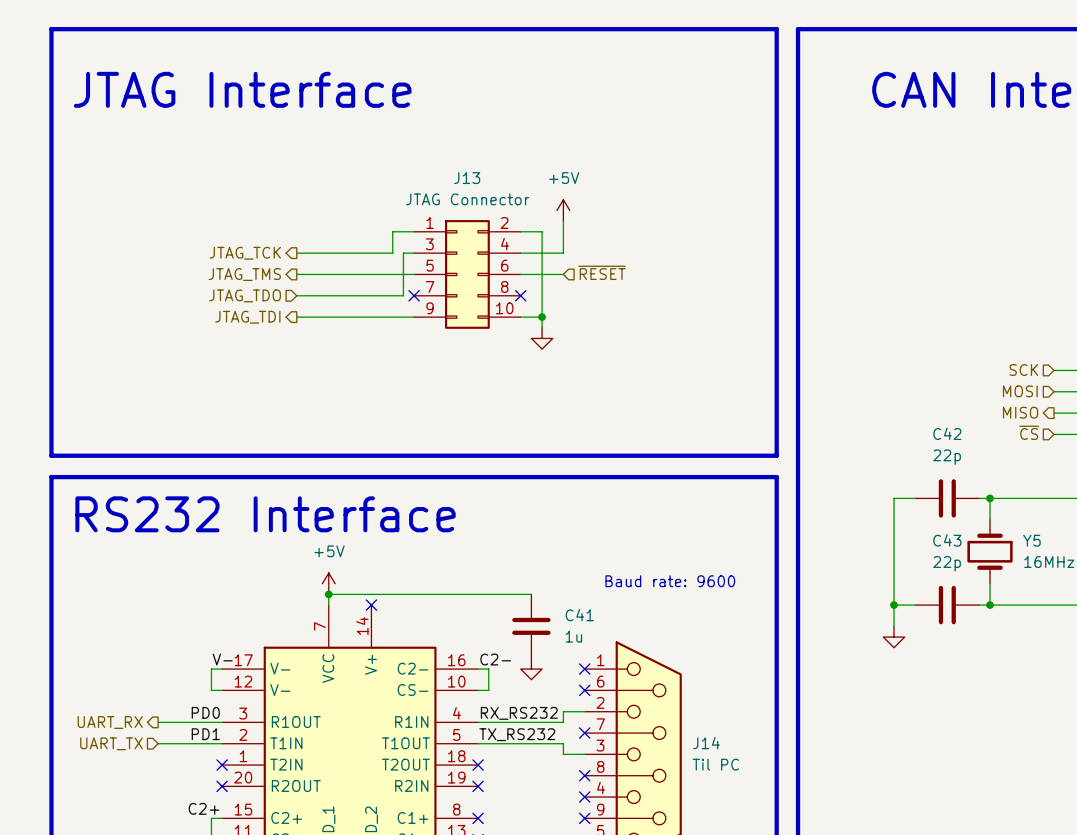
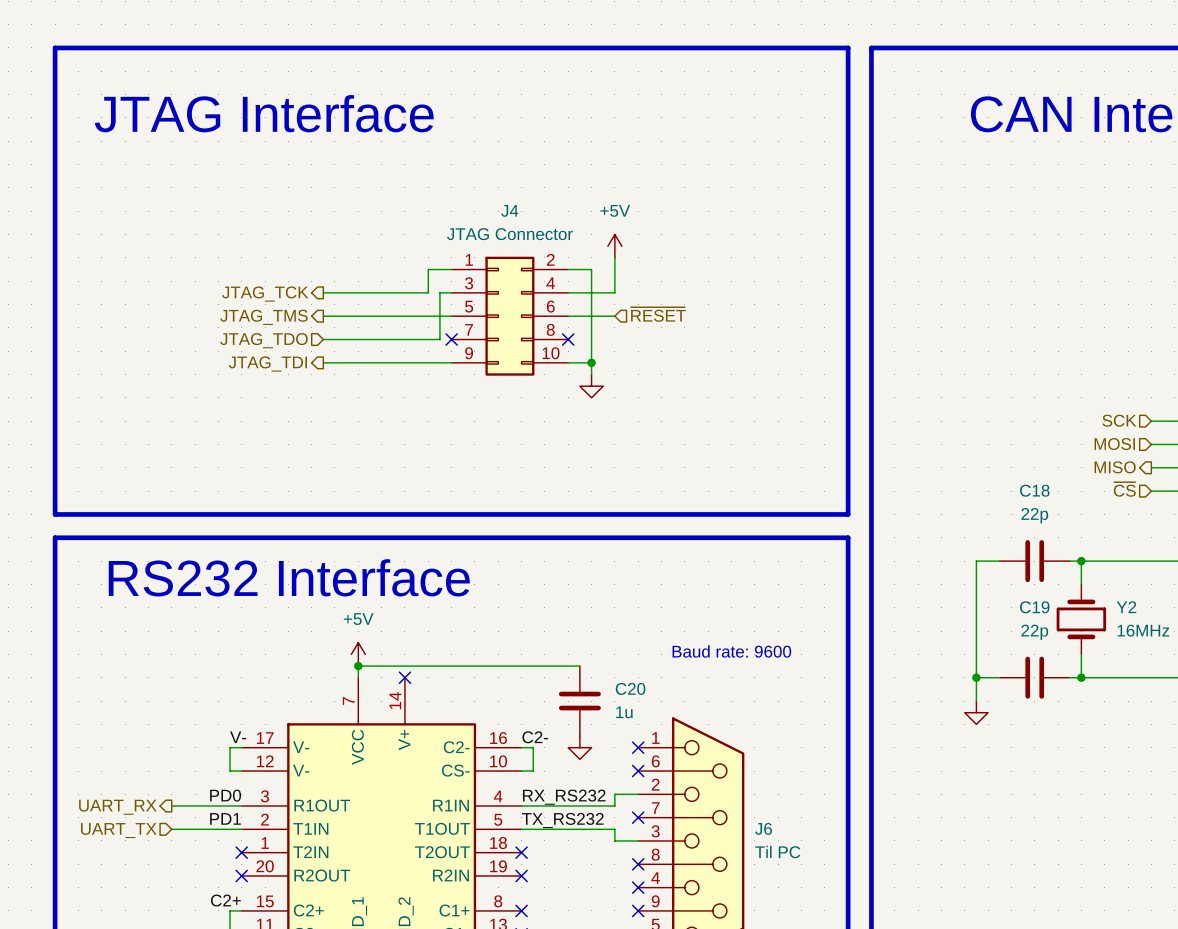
J13 name: J13 (467, 178) -> J4 (509, 210)
C42 name: C42 (947, 433) -> C18 (1034, 490)
C43 name: C43 (947, 540) -> C19 (1034, 607)
Y5 name: Y5 (1031, 540) -> Y2 (1126, 607)
C41 name: C41 (579, 615) -> C20 (630, 688)
J14 name: J14 (706, 743) -> J6 (763, 828)

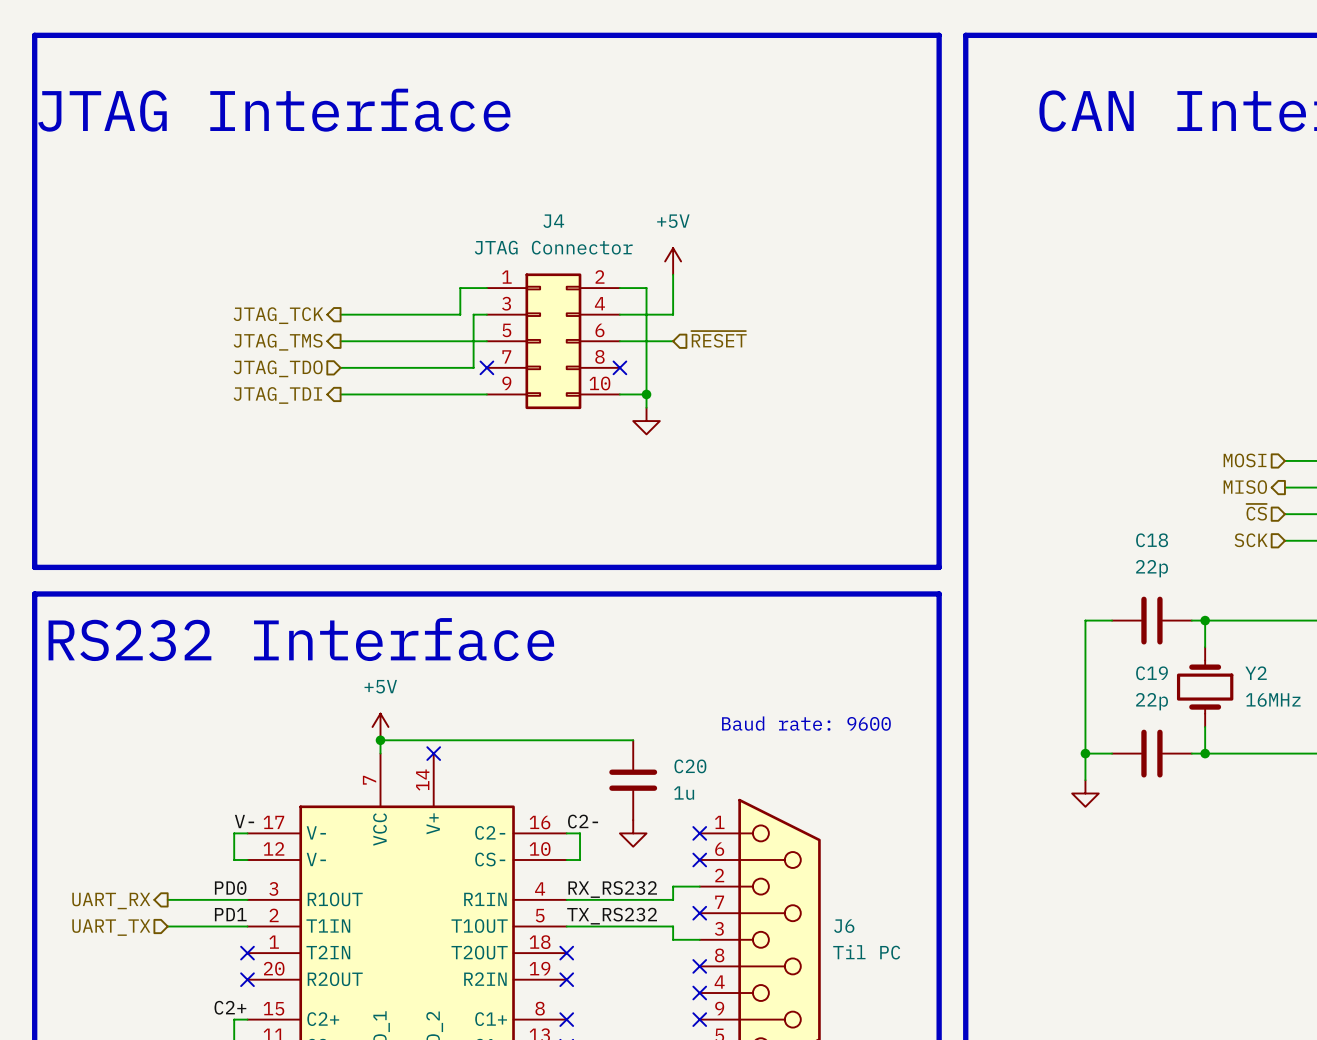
hierarchical label: SCK (1119, 420) -> MOSI (1245, 460)
hierarchical label shape: input (1114, 444) -> output (1245, 487)
hierarchical label: MOSI (1114, 444) -> MISO (1245, 487)
hierarchical label shape: output (1115, 467) -> input (1256, 512)
hierarchical label: MISO (1115, 467) -> ~{CS} (1256, 512)
hierarchical label: ~{CS} (1124, 489) -> SCK (1251, 540)

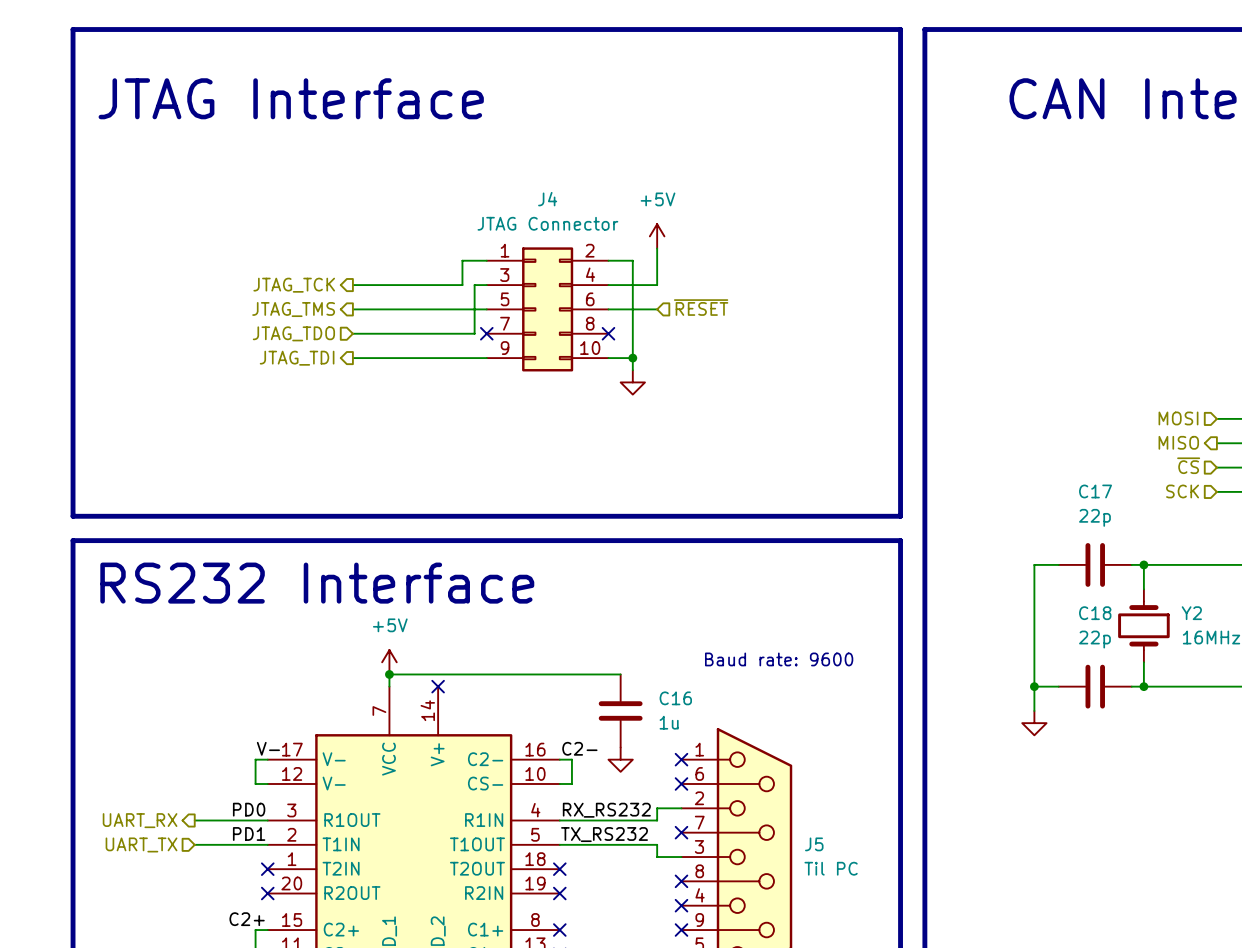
C18 name: C18 (1152, 540) -> C17 (1095, 491)
C19 name: C19 (1152, 673) -> C18 (1095, 613)
C20 name: C20 (690, 766) -> C16 (675, 698)
J6 name: J6 (844, 926) -> J5 (814, 844)

